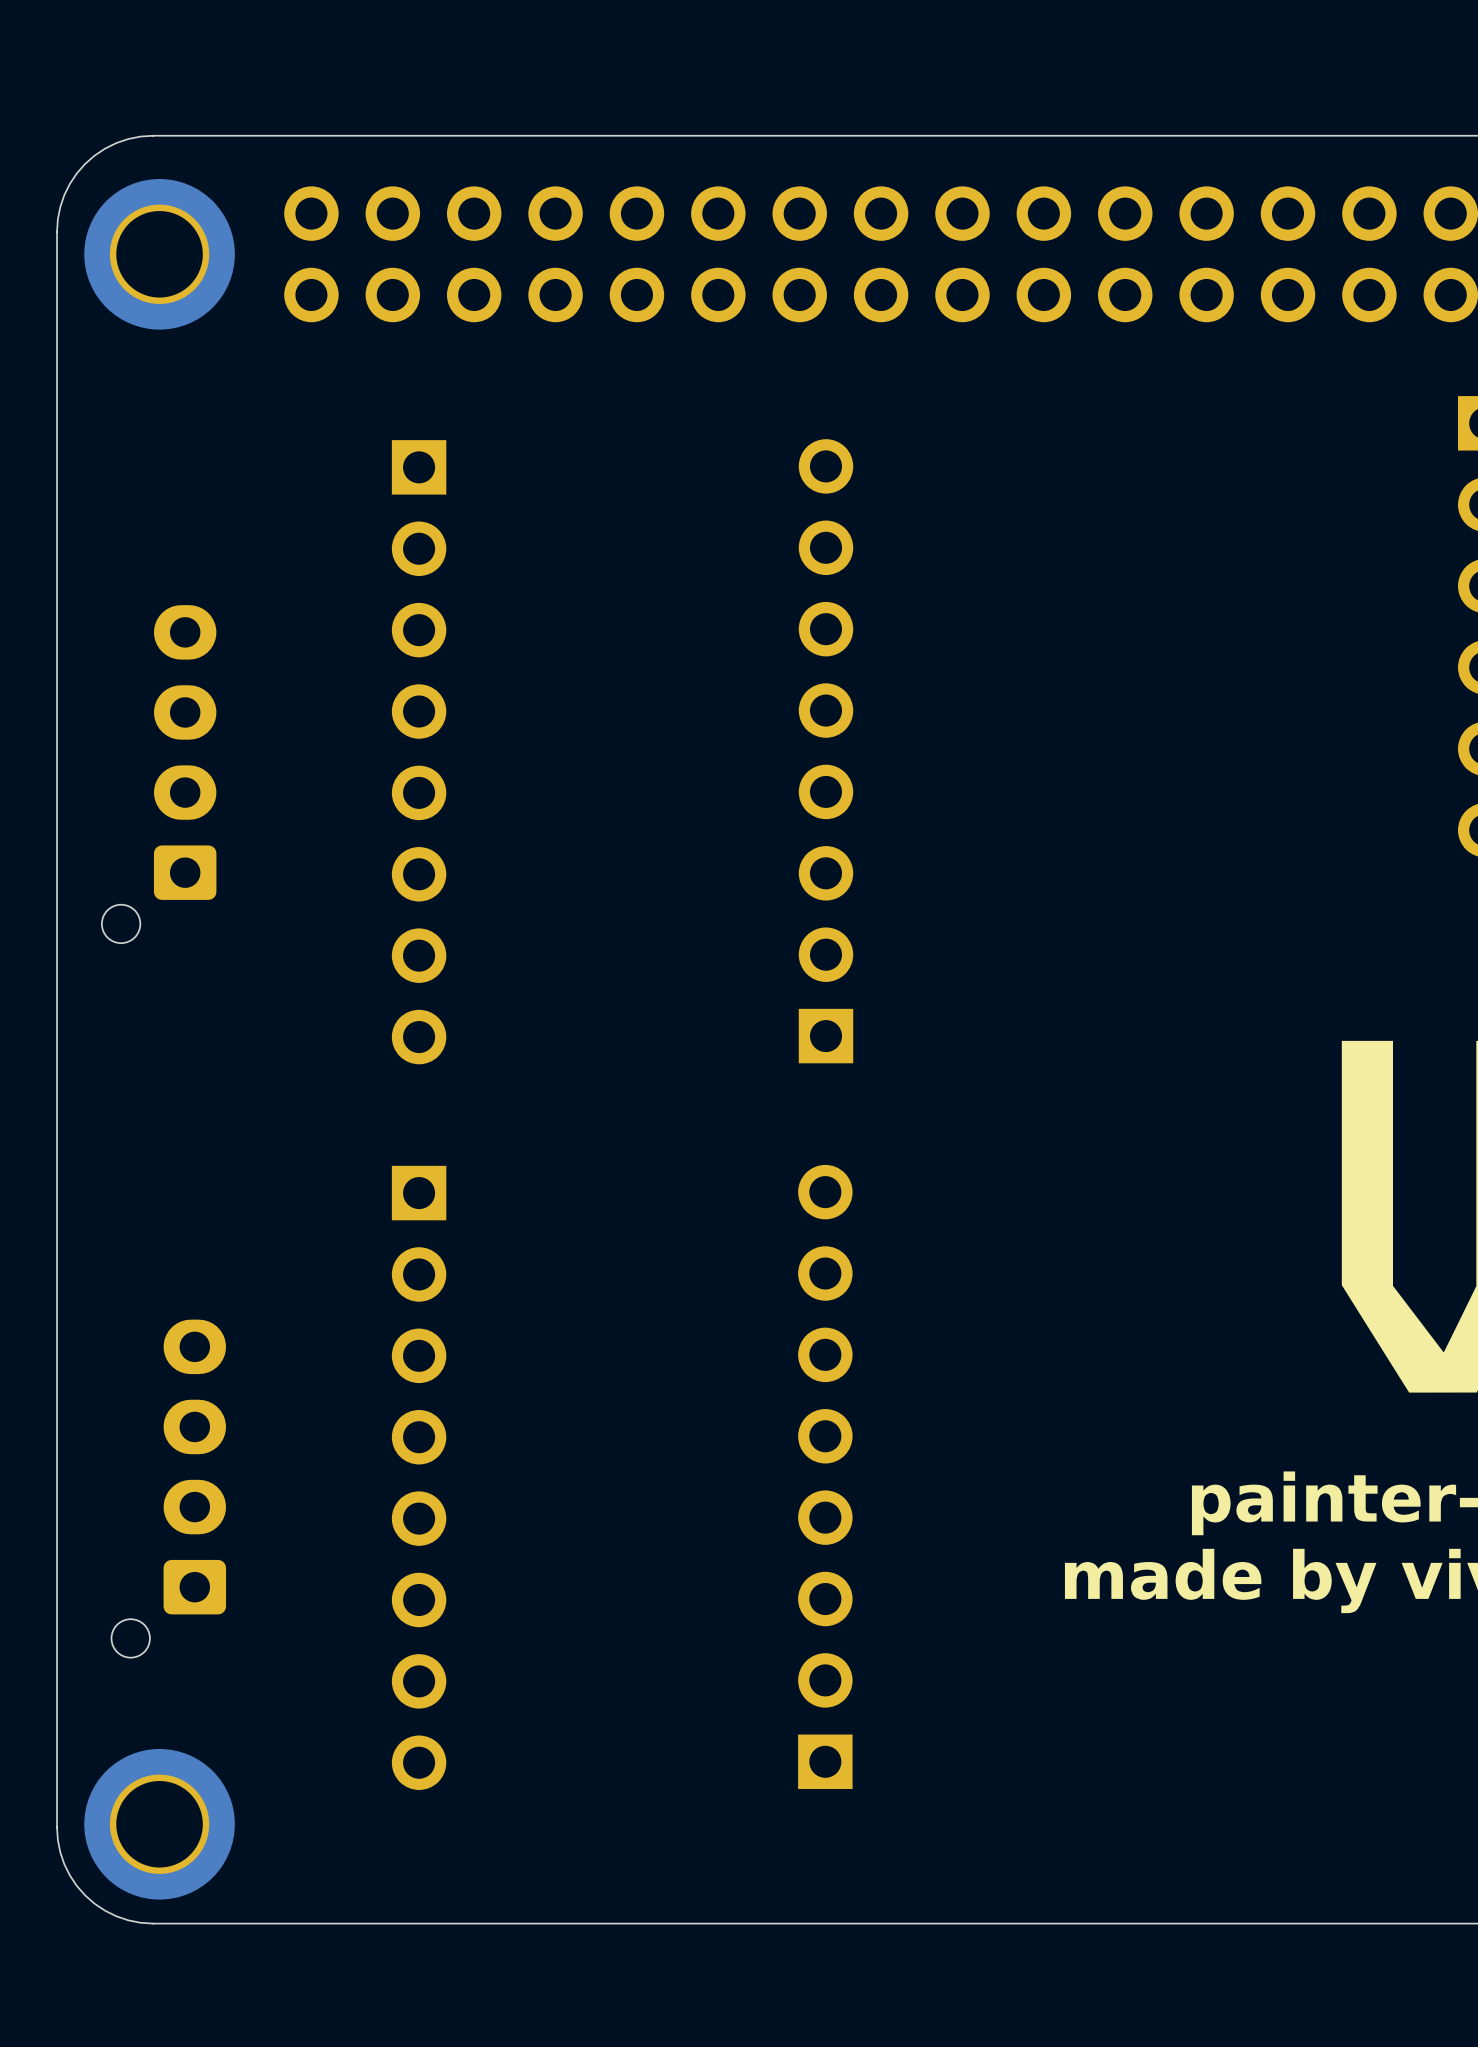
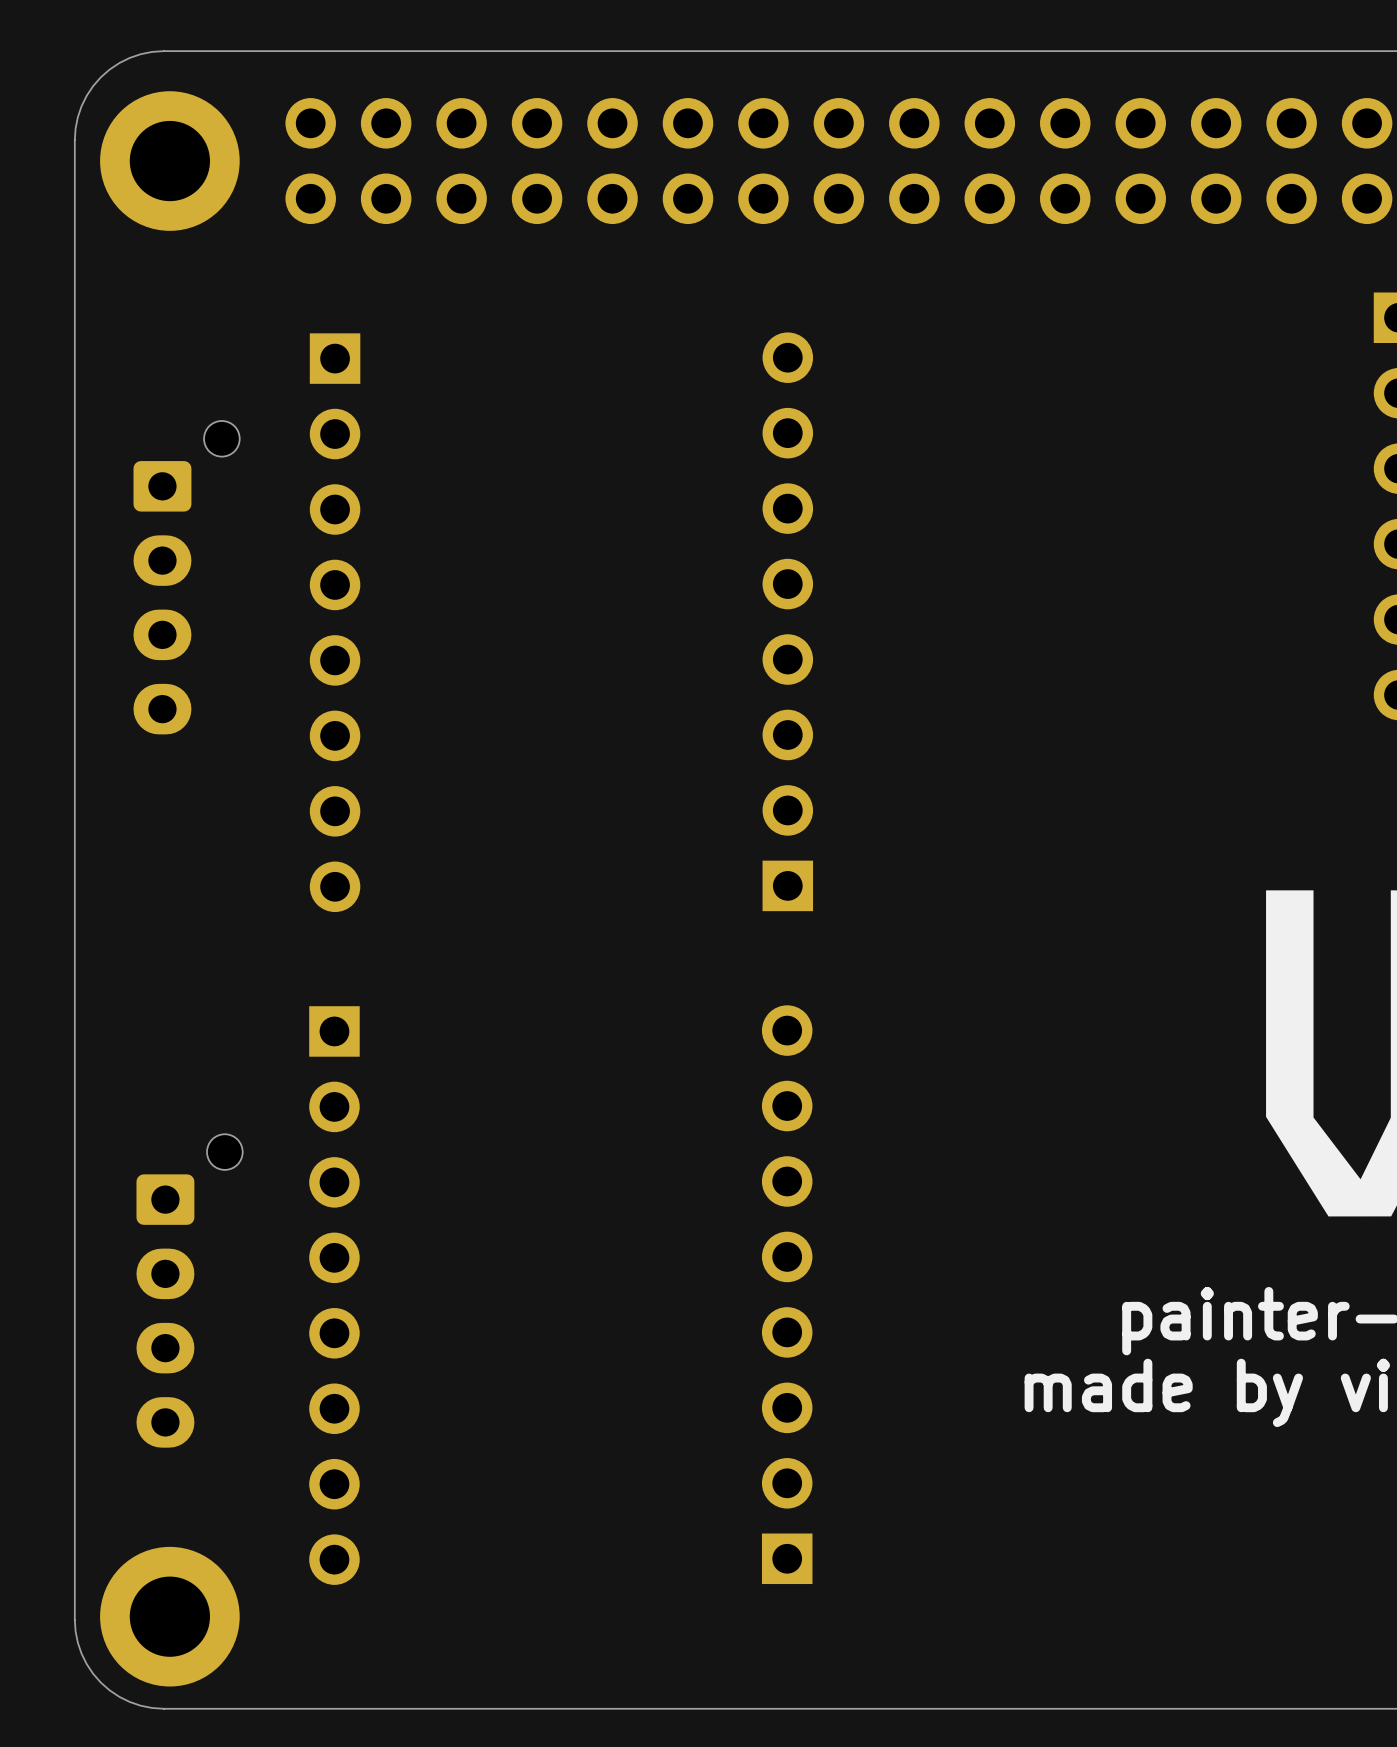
part position: (419, 752) -> (335, 622)
part rotation: 0° (159, 774) -> 180° (186, 577)
part position: (419, 1477) -> (334, 1295)
part rotation: 0° (168, 1488) -> 180° (189, 1290)

